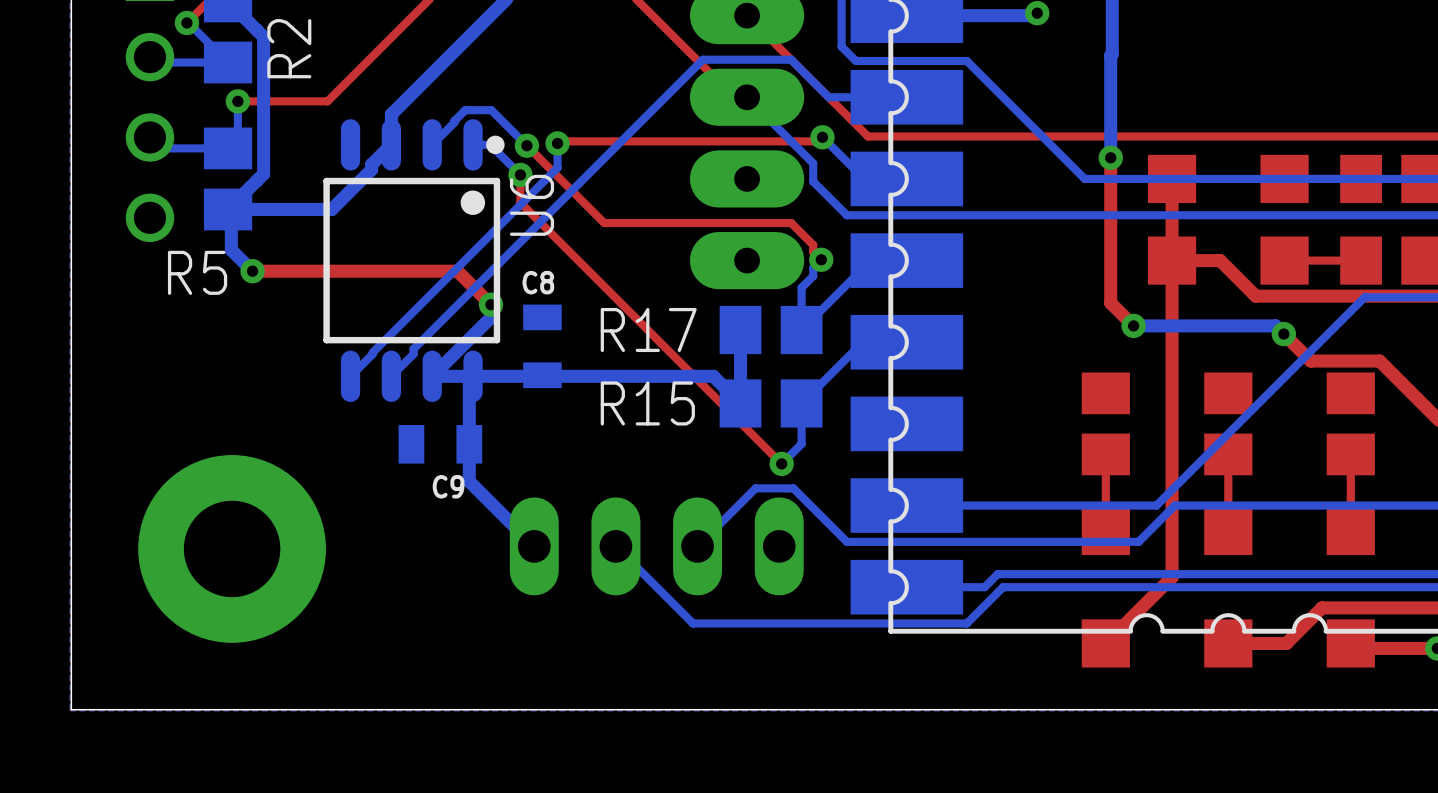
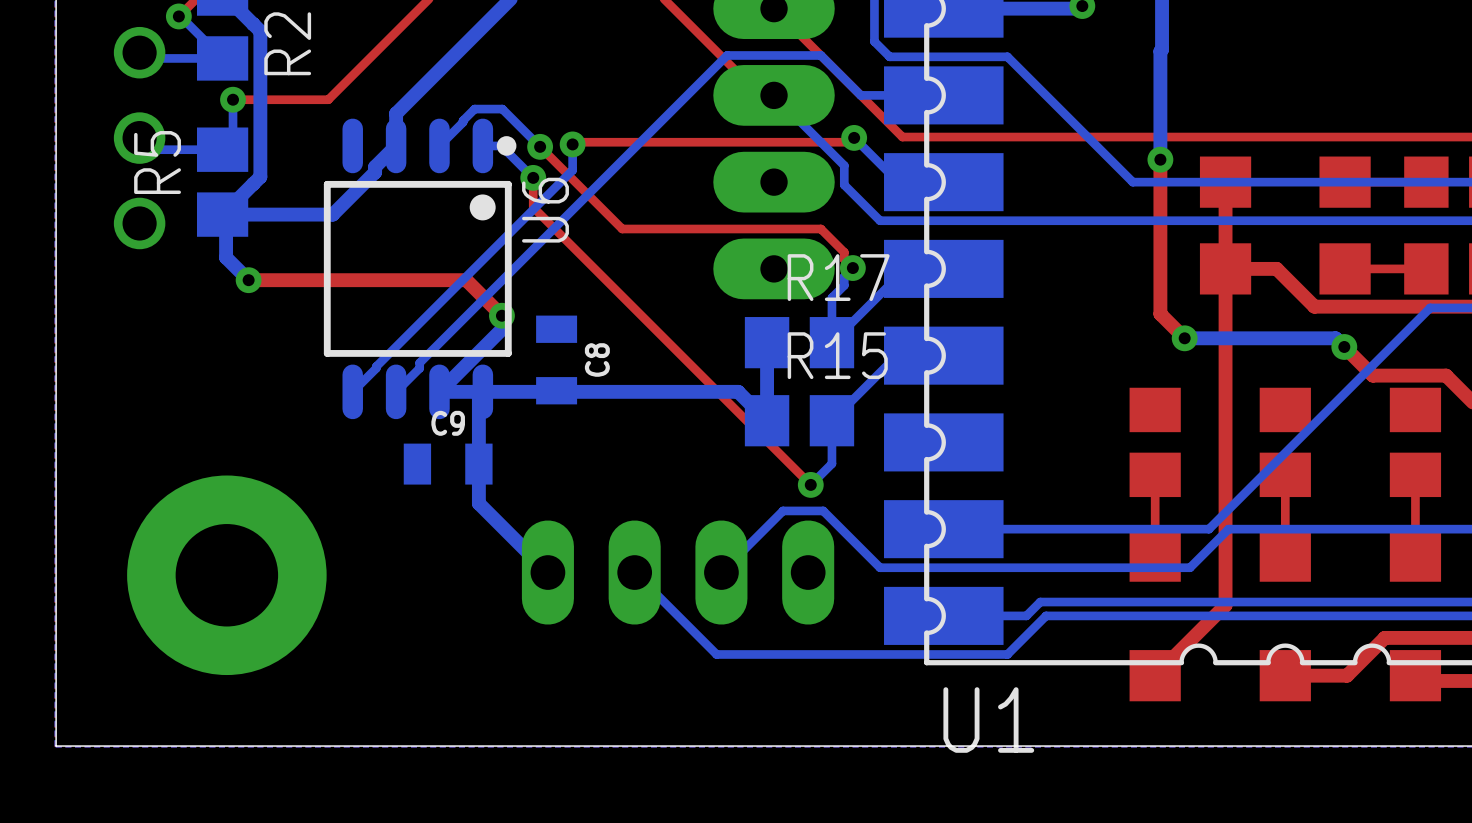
R5 name rotation: 0° (197, 272) -> 90° counterclockwise (157, 162)
R5 name position: R5 (197, 272) -> R5 (157, 162)
C8 name rotation: 0° (538, 282) -> 90° counterclockwise (597, 359)
C8 name position: C8 (538, 282) -> C8 (597, 359)
R17 name position: R17 (648, 329) -> R17 (838, 277)
R15 name position: R15 (647, 403) -> R15 (837, 355)
C9 name position: C9 (448, 486) -> C9 (448, 423)
U1 name: none -> U1 (988, 720)

